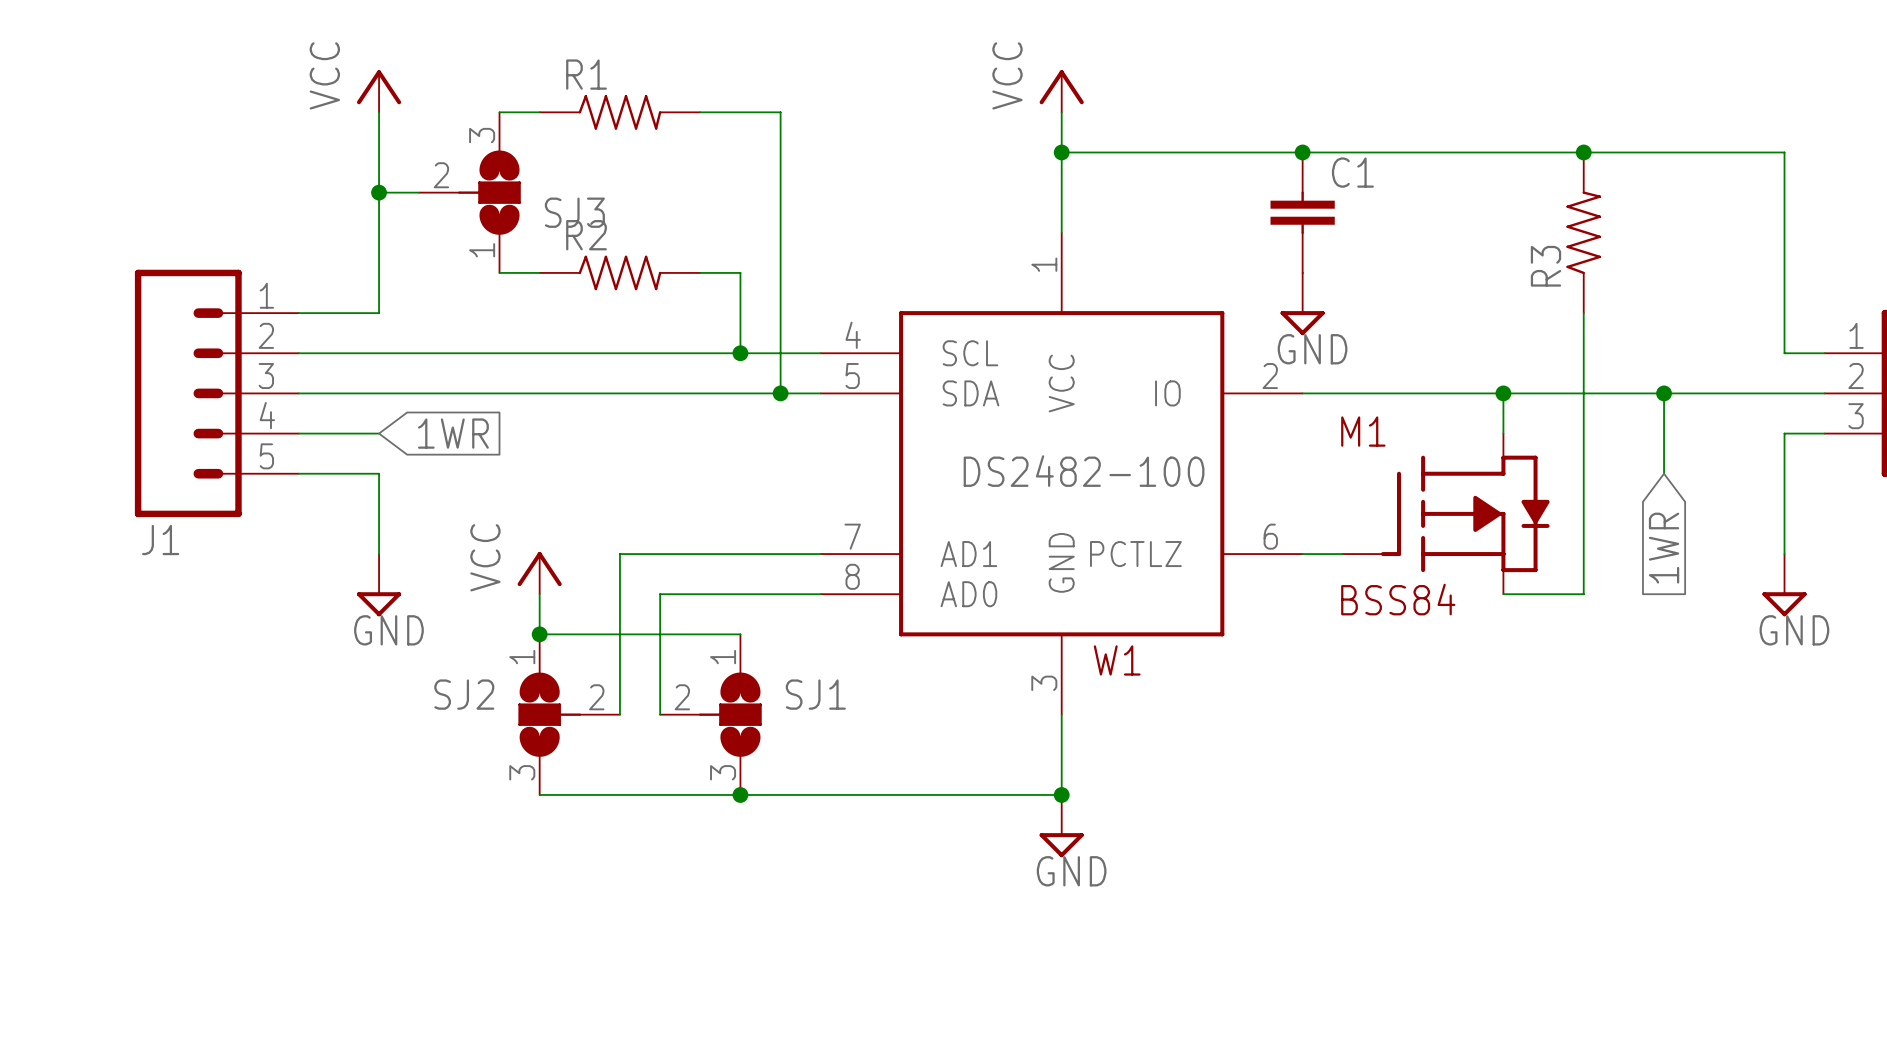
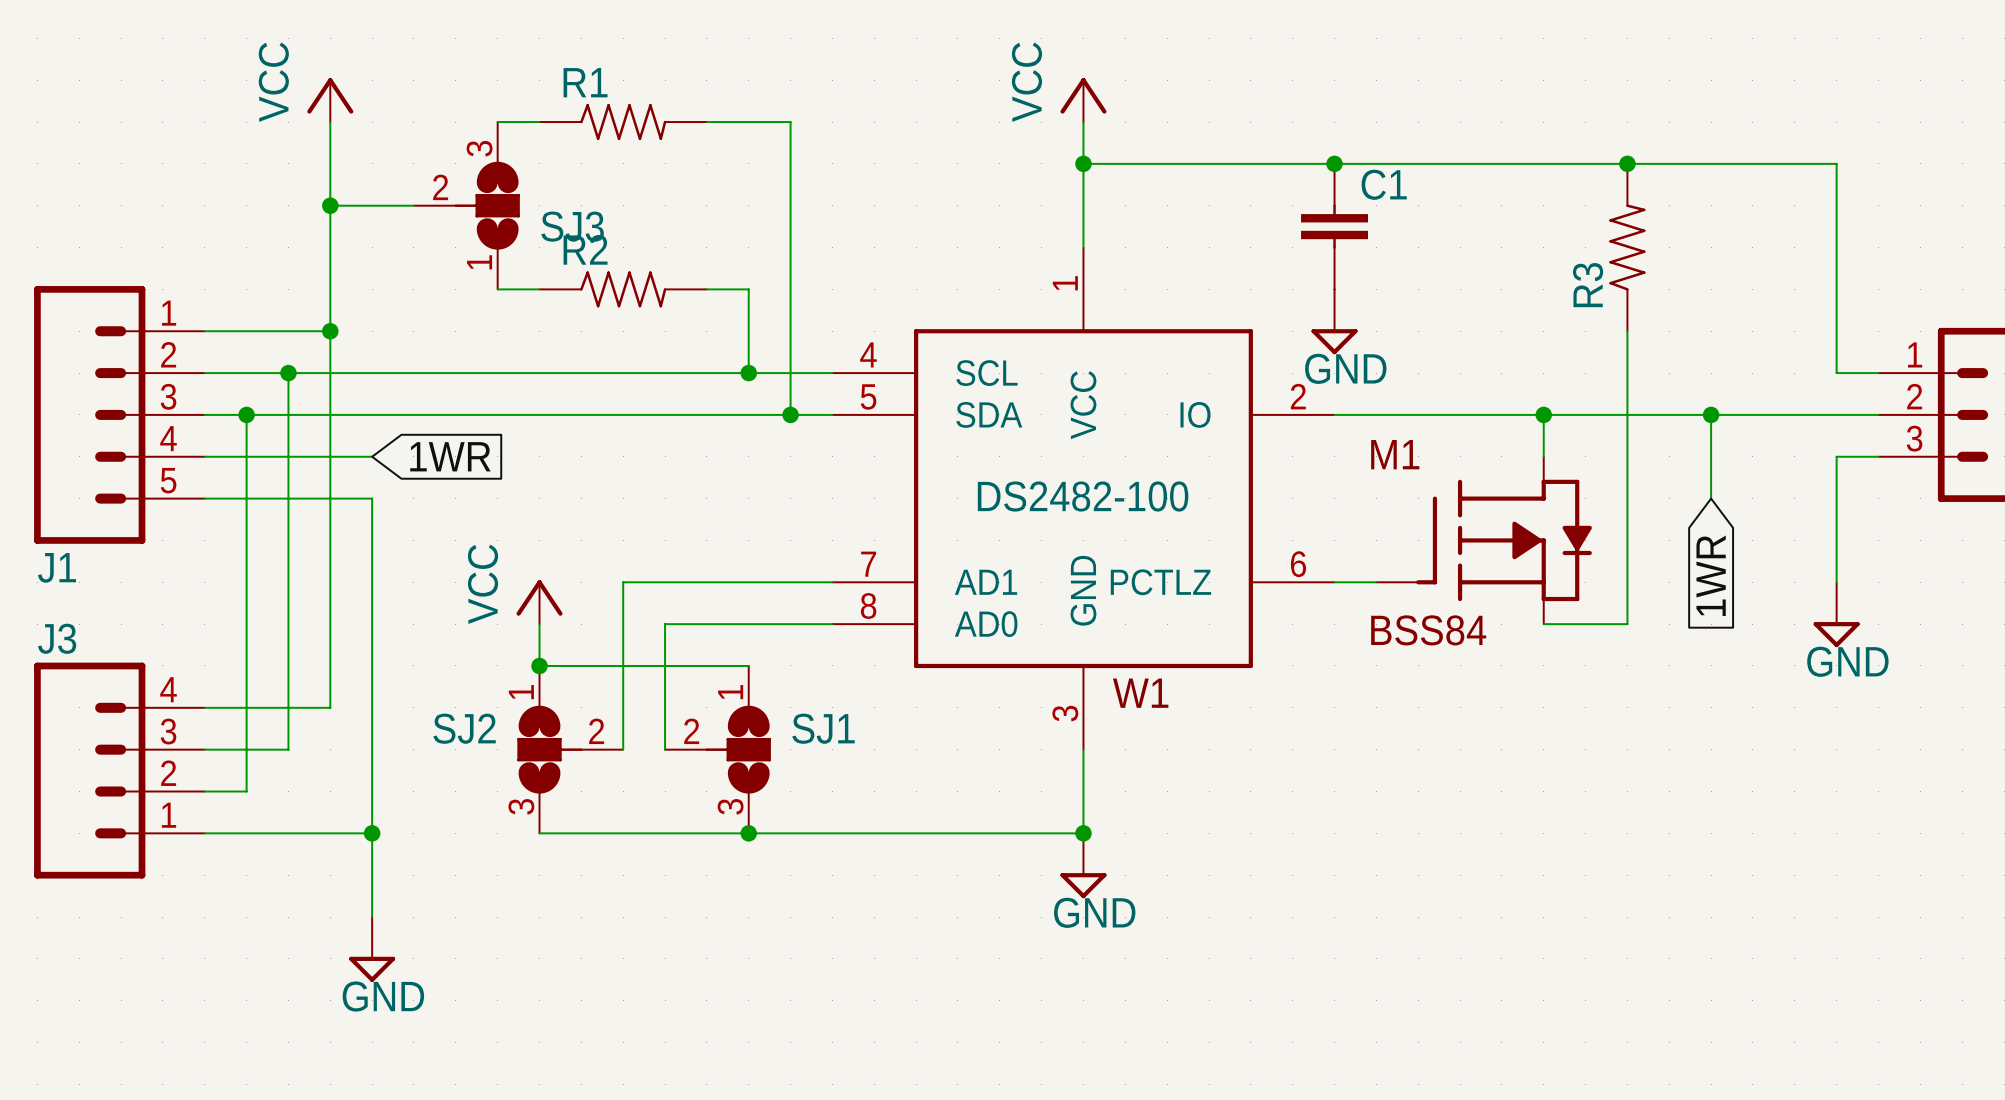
power symbol position: VCC (379, 91) -> VCC (330, 100)
wire: none -> (330, 122) (330, 707) (204, 707)
wire: (379, 112) (379, 313) (338, 313) -> none
wire: none -> (330, 205) (372, 205)
junction position: (379, 192) -> (330, 205)
junction: none -> (330, 331)
wire: none -> (204, 373) (288, 373) (288, 749) (204, 749)
junction: none -> (288, 373)
J1 position: (216, 393) -> (119, 414)
wire: none -> (246, 414) (246, 791) (204, 791)
junction: none -> (246, 414)
wire: none -> (372, 582) (372, 917)
power symbol position: GND (379, 585) -> GND (372, 949)
J3: none -> (119, 770)
wire: none -> (204, 833) (372, 833)
junction: none -> (372, 833)

